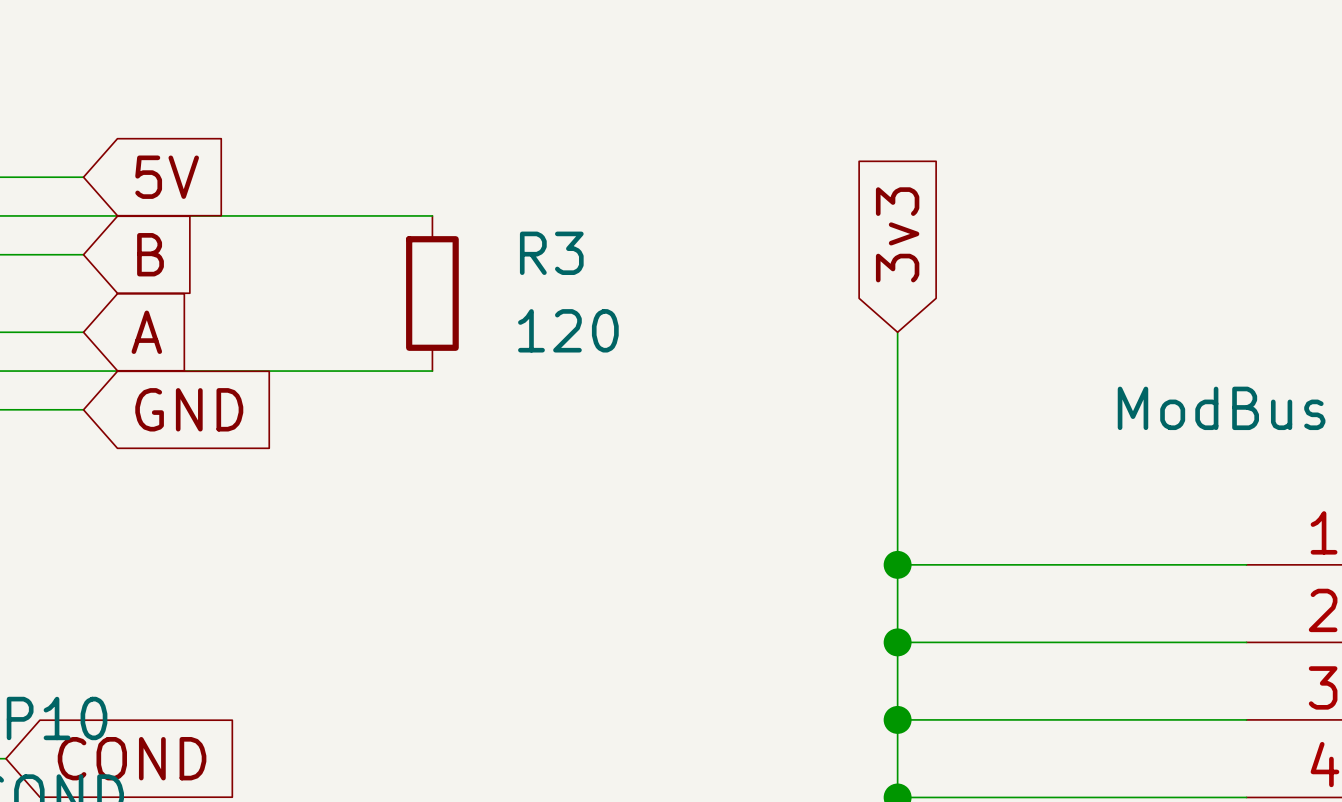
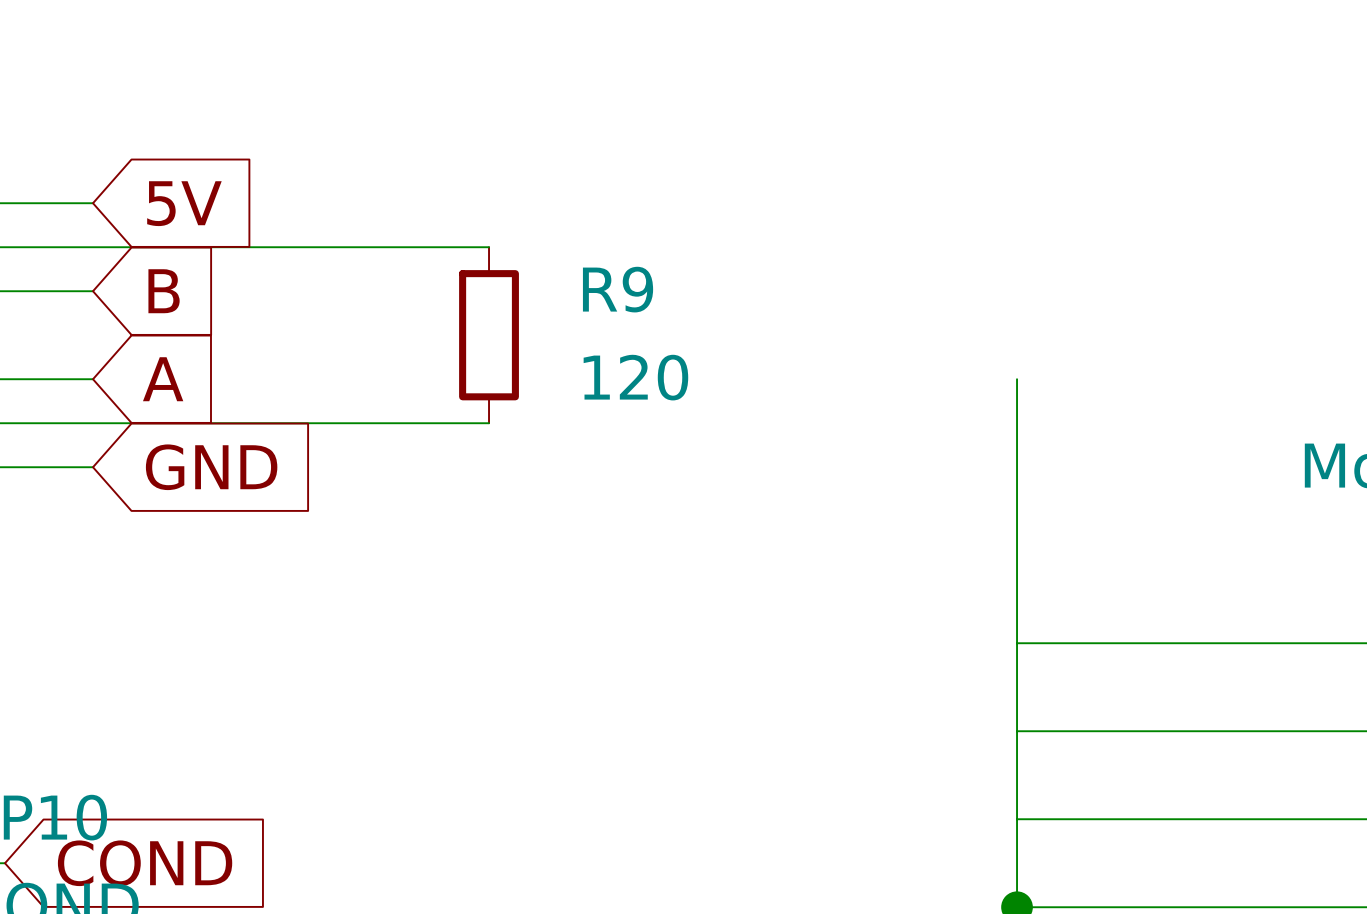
global label: 3v3 (897, 234) -> none
R3 name: R3 (551, 253) -> R9 (618, 289)
junction: (897, 564) -> none
junction: (897, 642) -> none
junction: (897, 719) -> none

